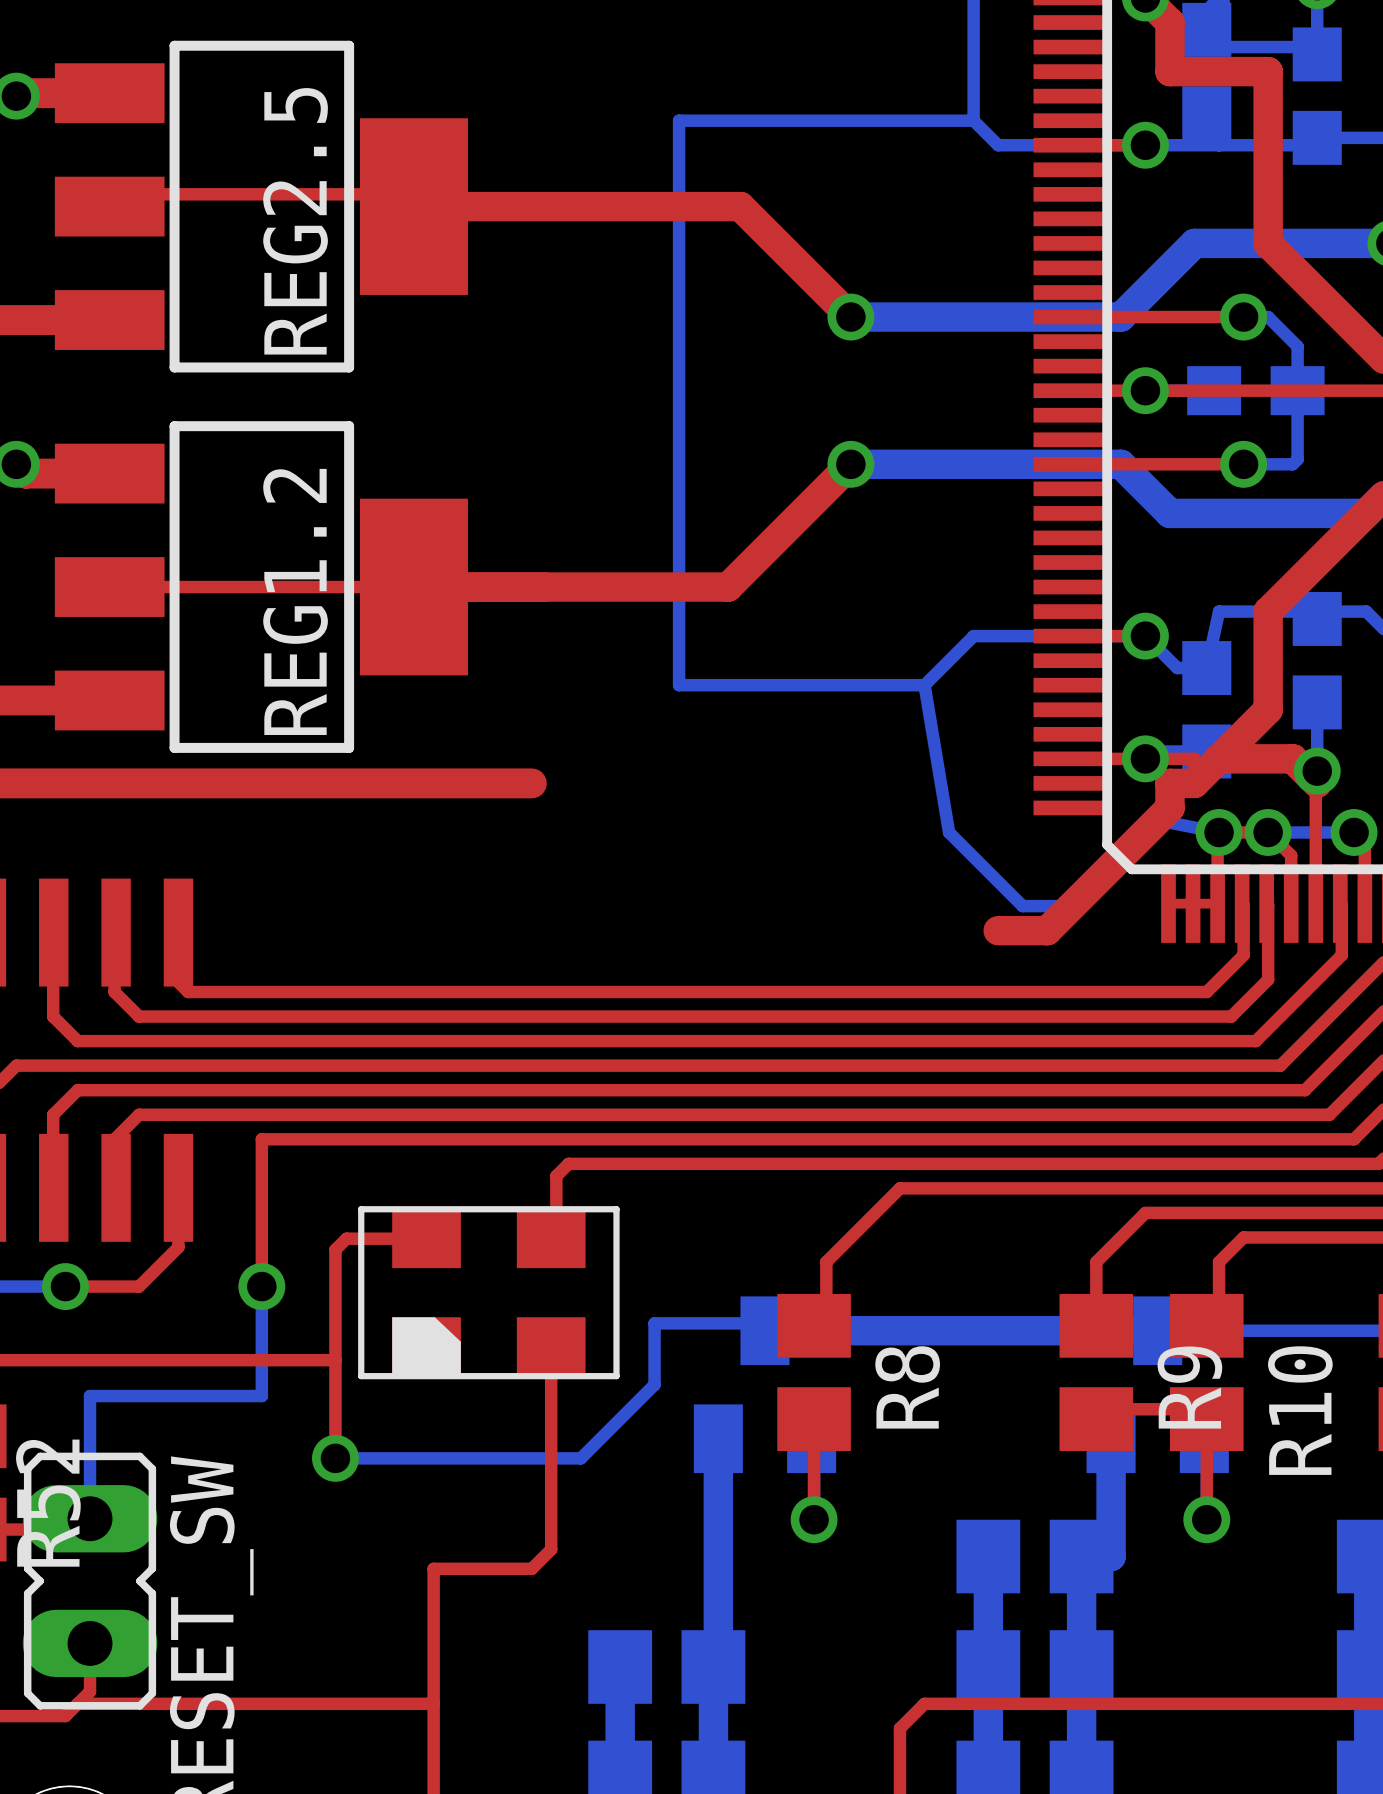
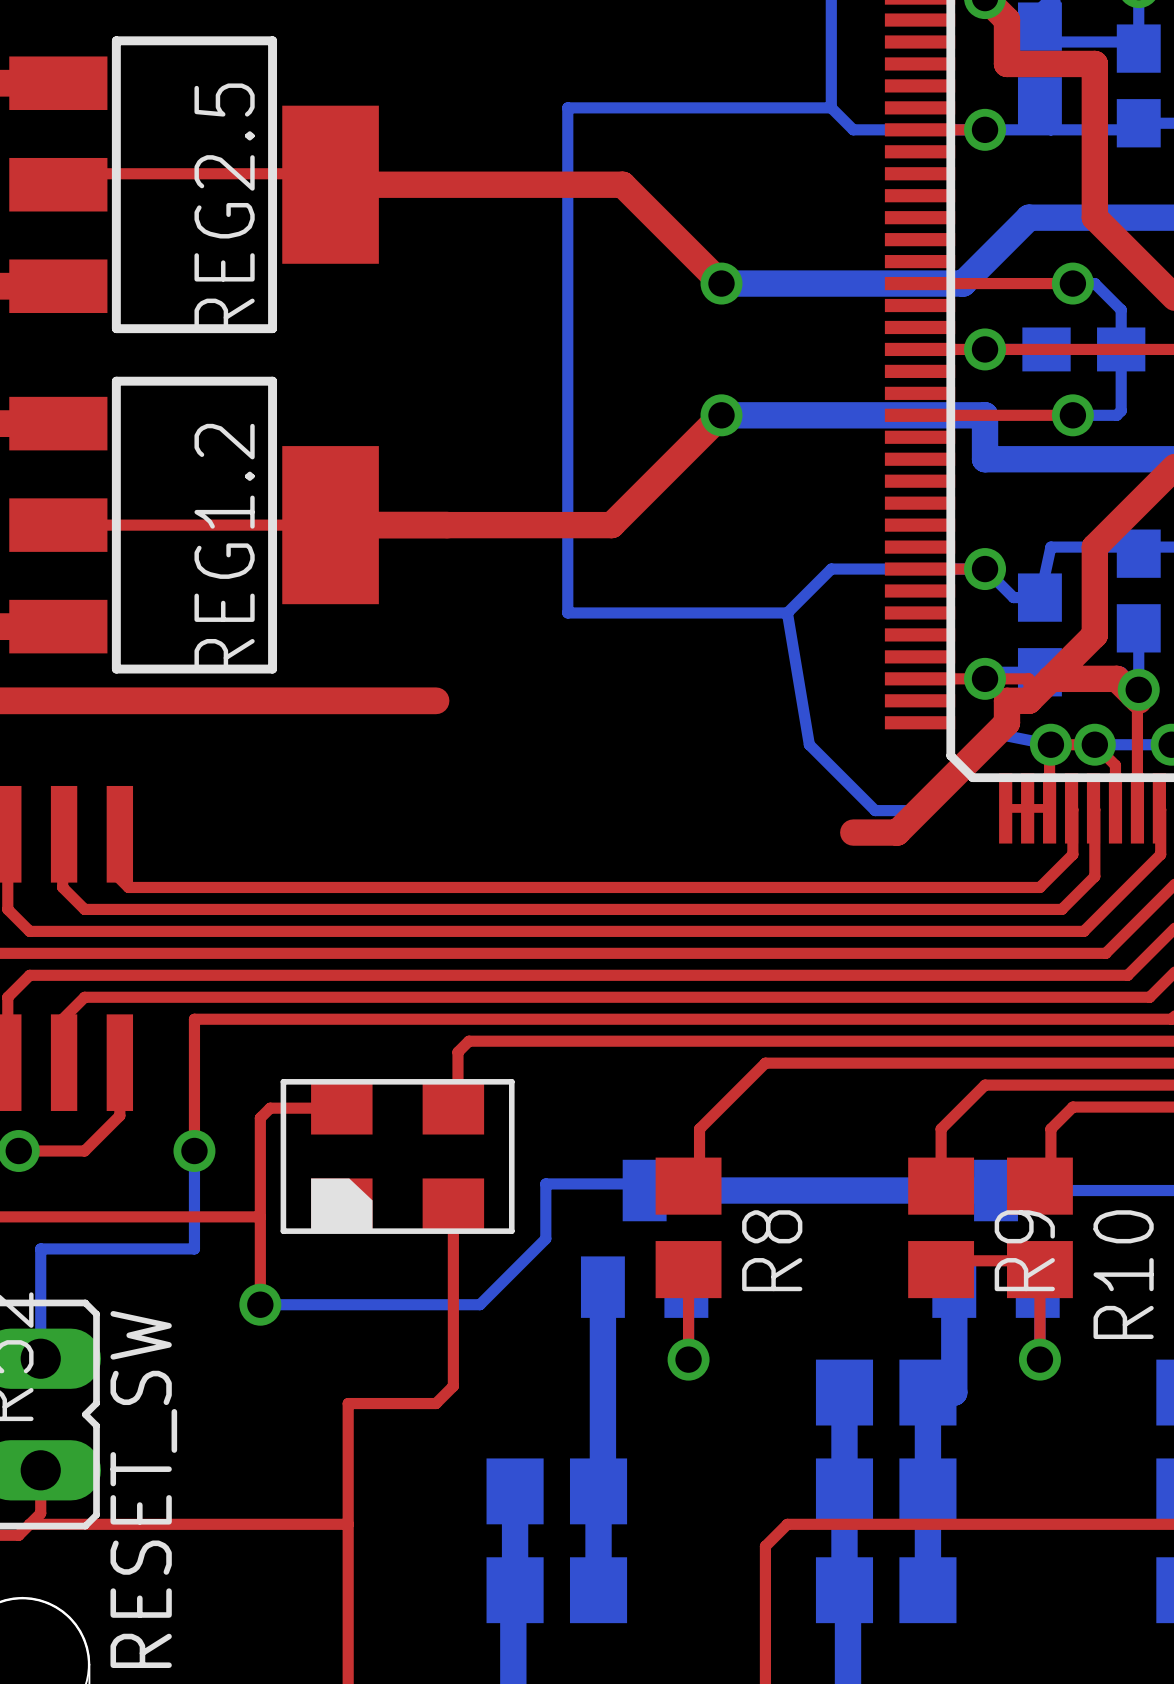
bottom track: (1120, 464) (1169, 513) -> (963, 415) (985, 415) (985, 459) (1006, 459)

